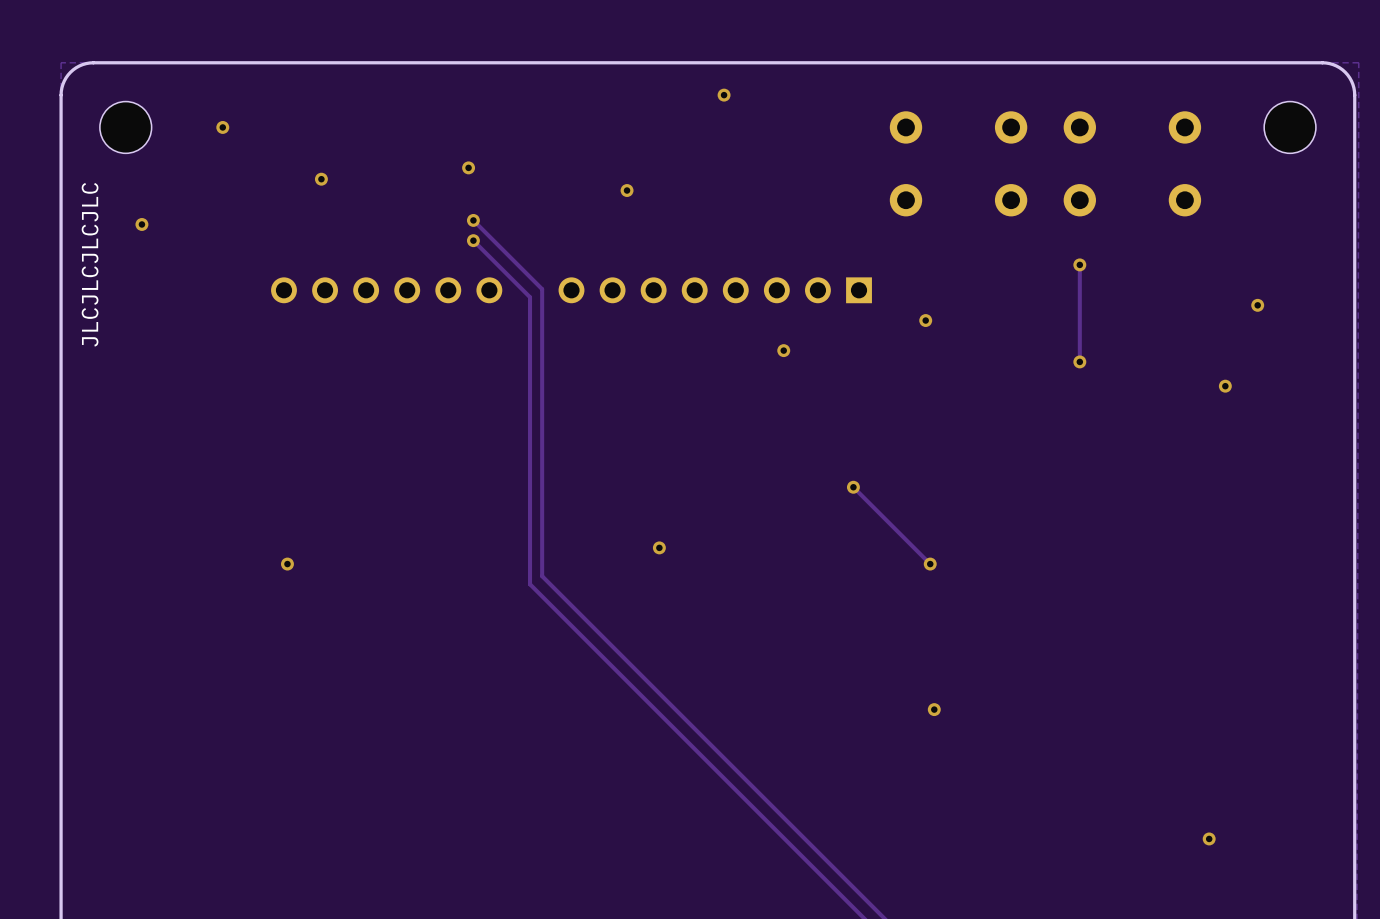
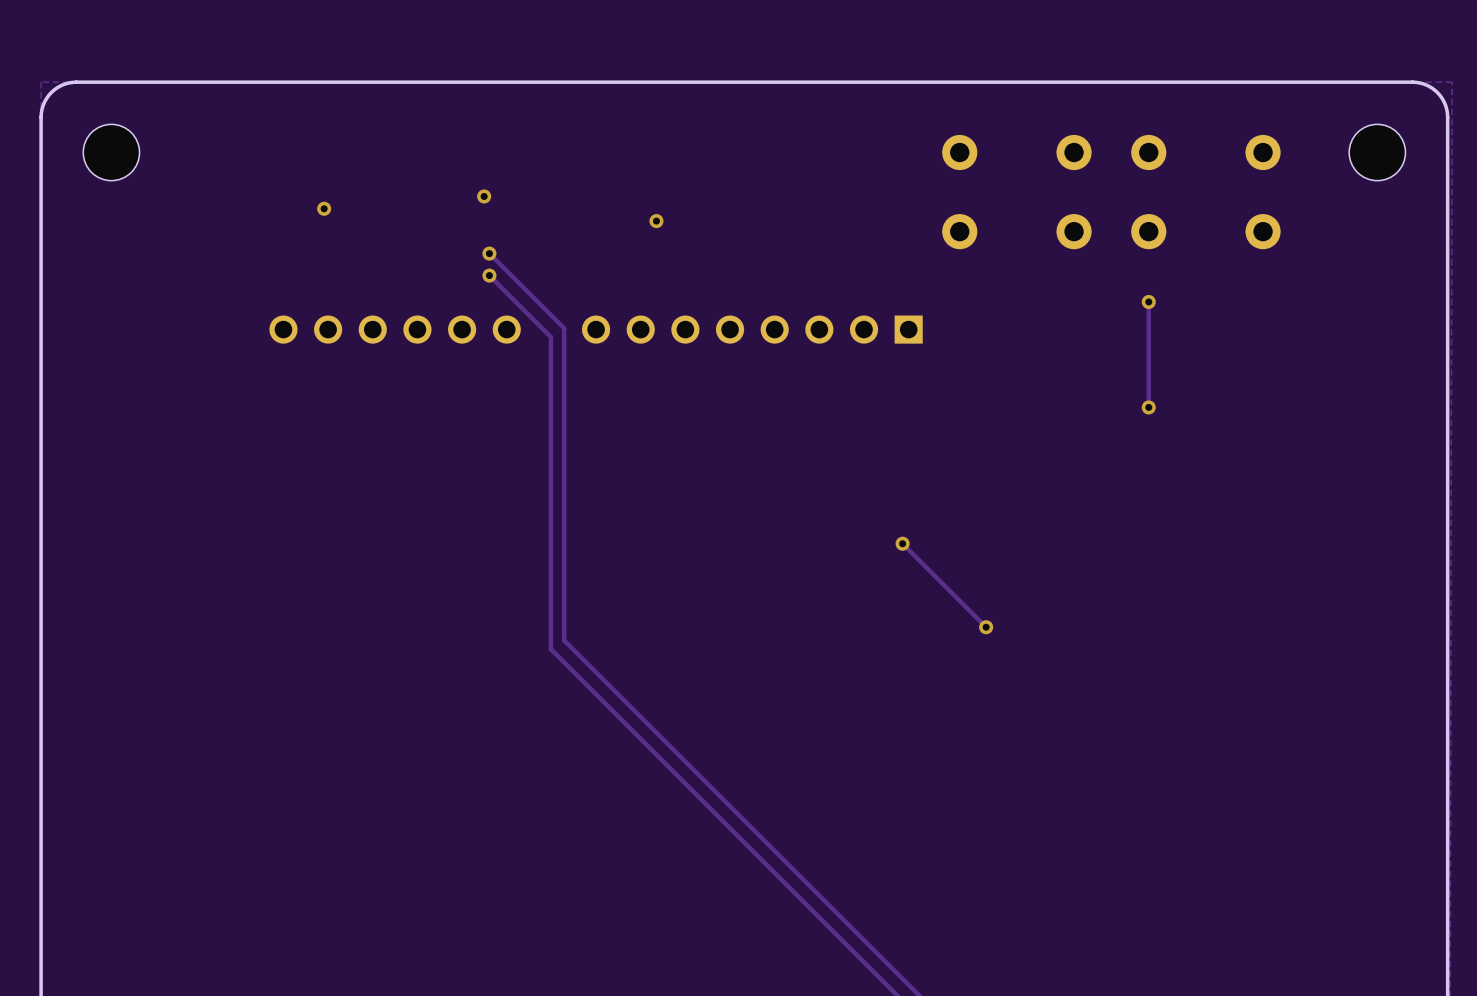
via: (724, 95) -> none
via: (222, 127) -> none
via: (141, 224) -> none
text: JLCJLCJLCJLC (90, 264) -> none
via: (1257, 305) -> none
via: (925, 320) -> none
via: (783, 350) -> none
via: (1225, 386) -> none
via: (659, 547) -> none
via: (287, 564) -> none
via: (934, 709) -> none
via: (1209, 838) -> none

